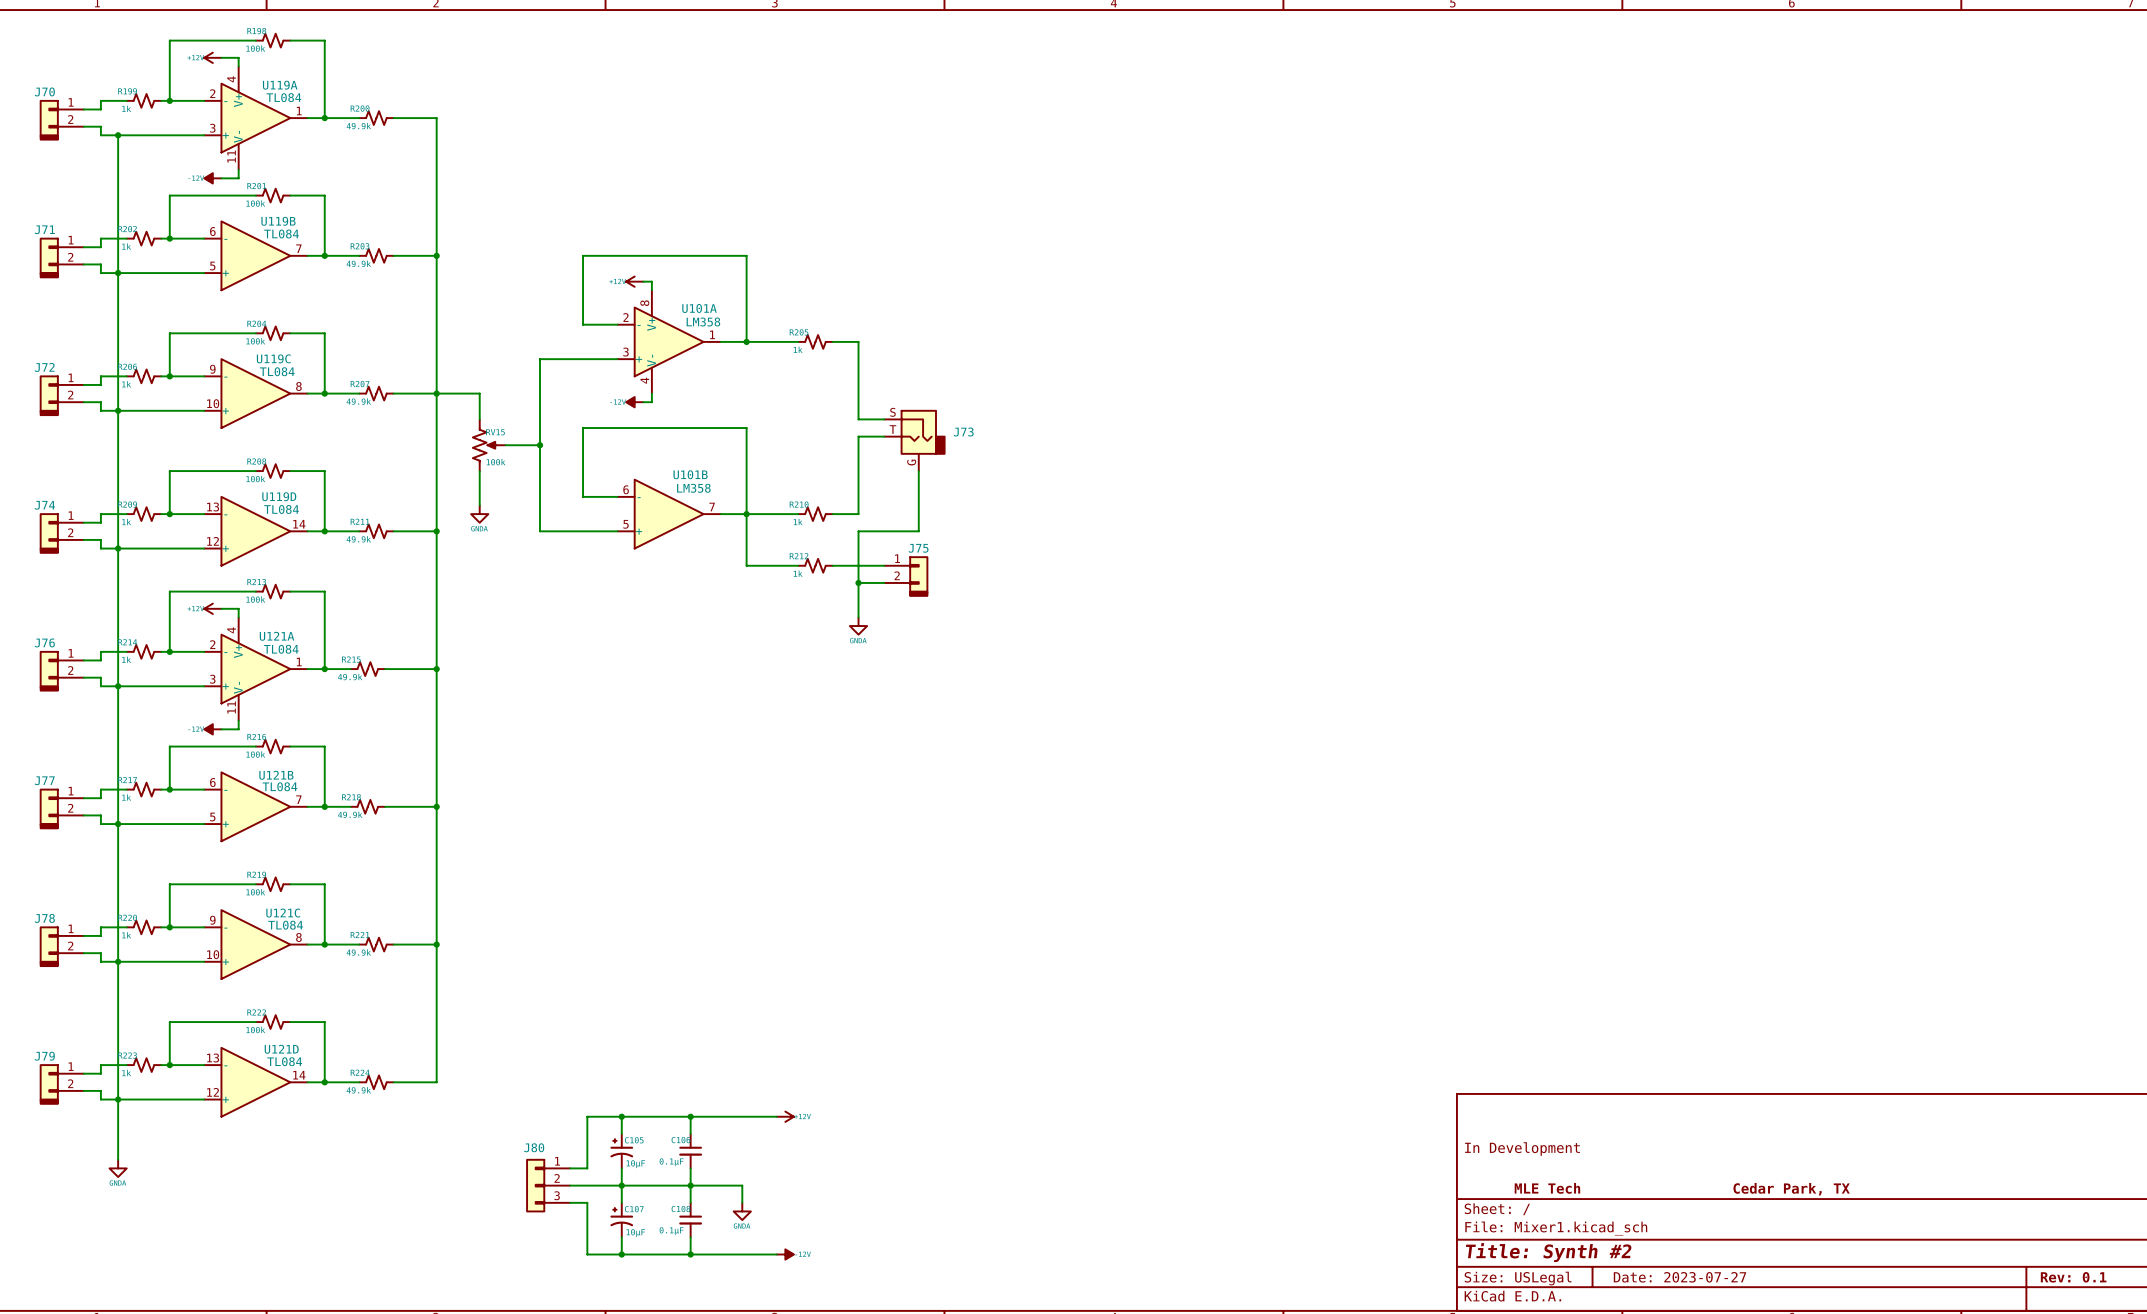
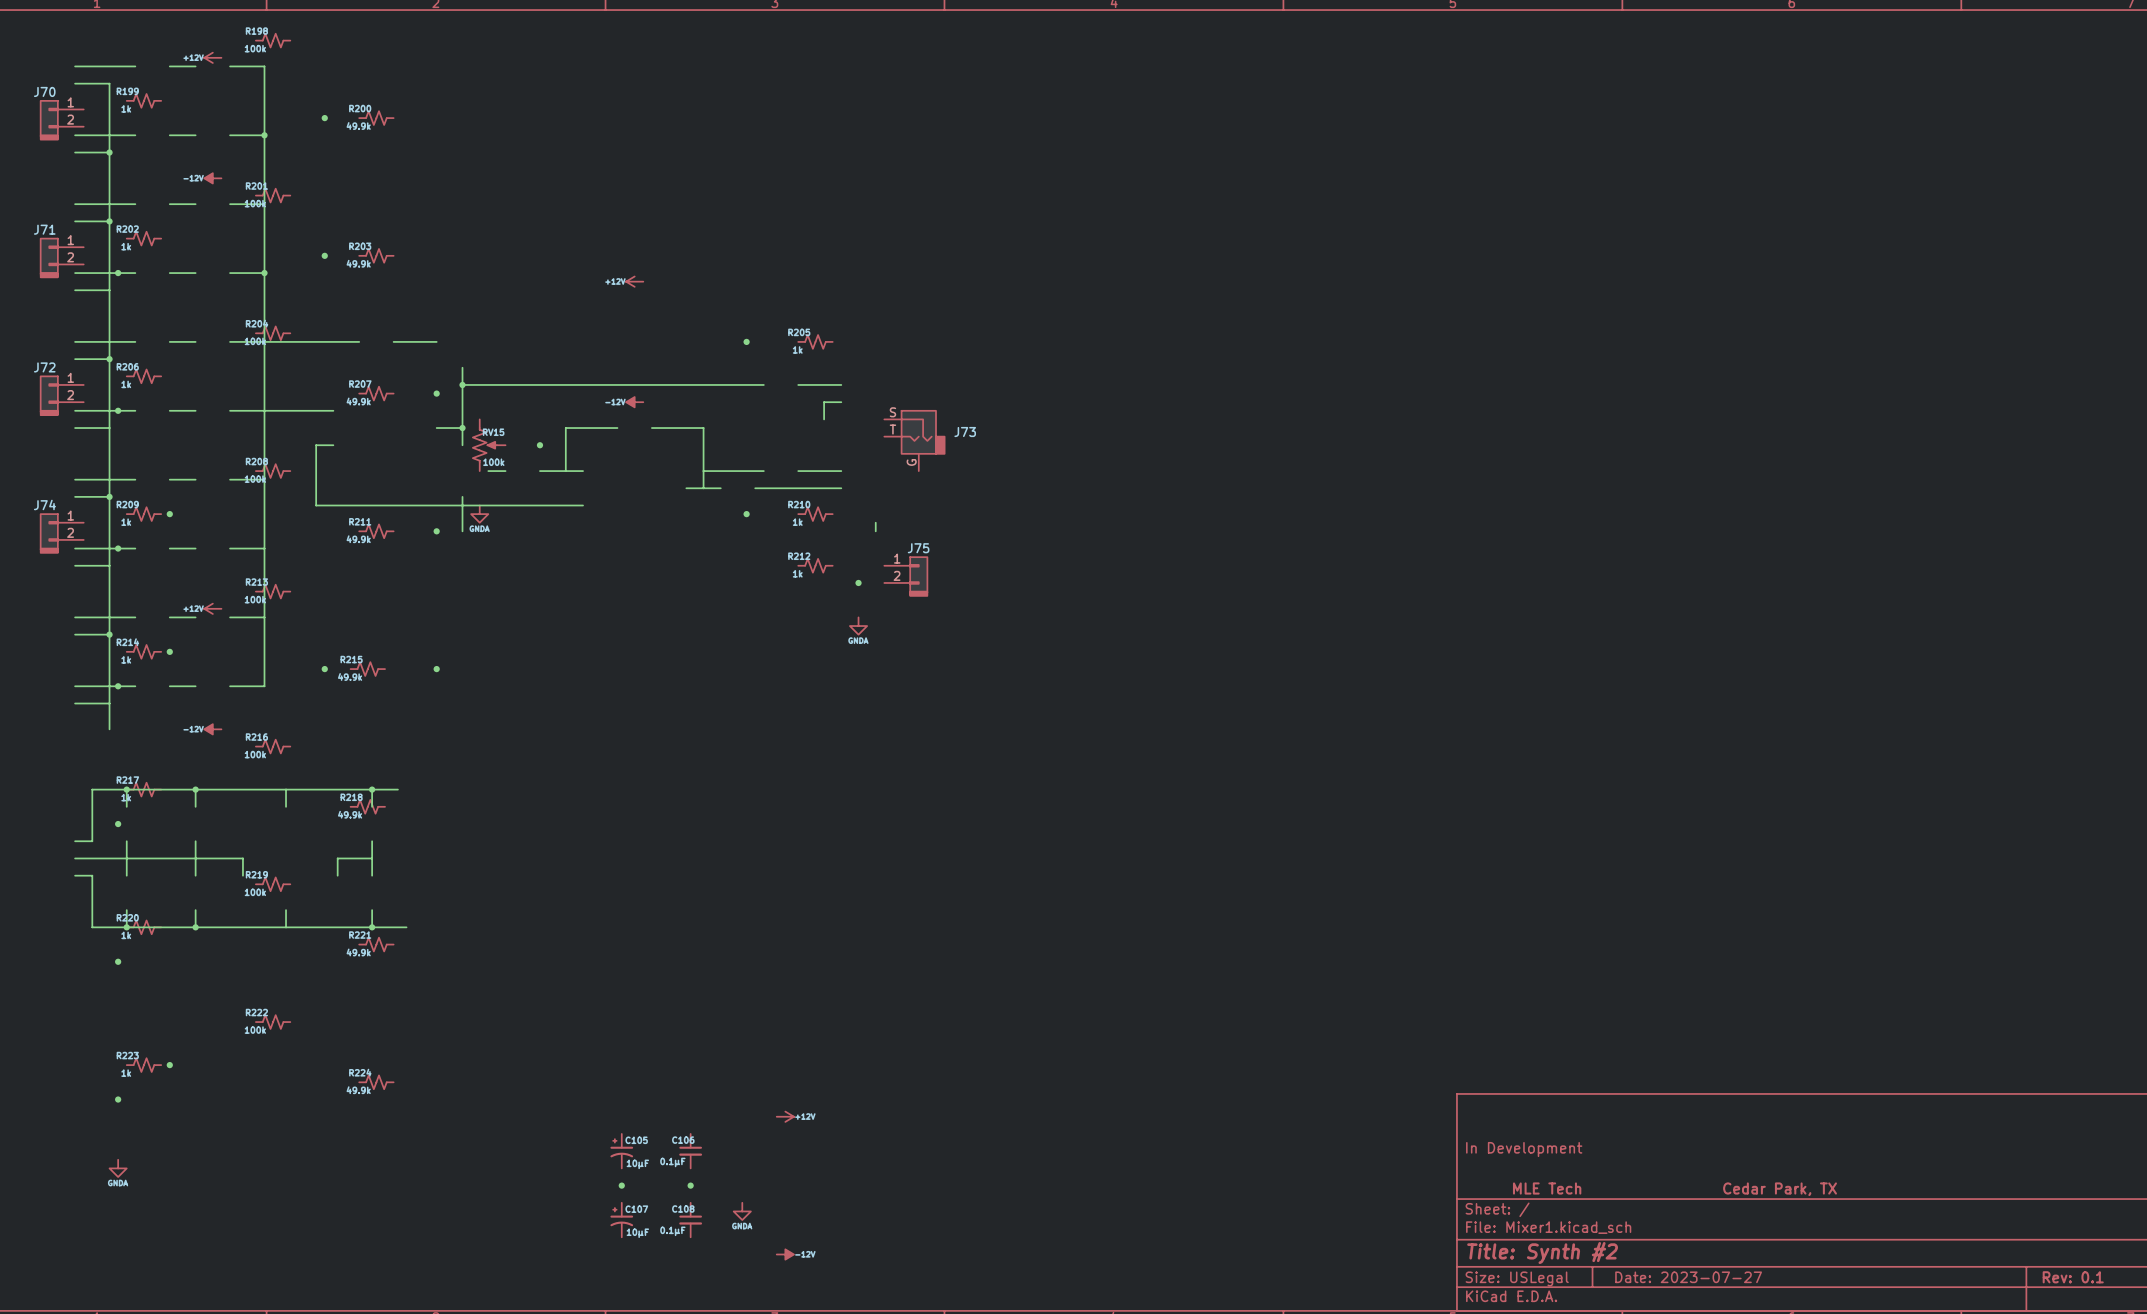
wire: (255, 40) (169, 40) (169, 100) -> none
wire: (290, 40) (324, 40) (324, 118) -> none
wire: (221, 57) (238, 57) (238, 66) -> none
wire: none -> (75, 66) (135, 66)
wire: none -> (169, 66) (195, 66)
wire: none -> (230, 66) (264, 66) (264, 686) (230, 686)
wire: none -> (75, 83) (109, 83) (109, 729)
wire: (126, 100) (100, 100) (100, 109) (83, 109) -> none
wire: (161, 100) (204, 100) -> none
junction: (169, 100) -> none
part: (238, 118) -> none
U119A: TL084 (255, 118) -> none
wire: (307, 118) (359, 118) -> none
wire: (393, 118) (436, 118) (436, 1082) (393, 1082) -> none
wire: (83, 126) (100, 126) (100, 135) -> (75, 135) (100, 135)
wire: (118, 135) (118, 1159) -> none
junction position: (118, 135) -> (109, 152)
wire: (135, 135) (169, 135) -> (75, 152) (109, 152)
wire: (195, 135) (204, 135) -> none
junction: none -> (264, 135)
wire: (238, 169) (238, 178) (221, 178) -> none
wire: (255, 195) (169, 195) (169, 238) -> none
wire: (290, 195) (324, 195) (324, 255) -> none
wire: none -> (75, 204) (135, 204)
wire: none -> (169, 204) (195, 204)
wire: none -> (230, 204) (264, 204)
wire: none -> (75, 221) (109, 221)
junction: none -> (109, 221)
wire: (126, 238) (100, 238) (100, 247) (83, 247) -> none
wire: (161, 238) (204, 238) -> none
junction: (169, 238) -> none
U119B: TL084 (255, 255) -> none
wire: (307, 255) (359, 255) -> none
wire: (393, 255) (436, 255) -> (393, 341) (436, 341)
junction: (436, 255) -> none
wire: (83, 264) (100, 264) (100, 273) -> (75, 273) (100, 273)
wire: (135, 273) (169, 273) -> (75, 290) (109, 290)
wire: (195, 273) (204, 273) -> none
junction: none -> (264, 273)
wire: (643, 281) (651, 281) (651, 290) -> none
wire: (617, 324) (583, 324) (583, 255) (746, 255) (746, 341) -> none
wire: (255, 333) (169, 333) (169, 376) -> none
wire: (290, 333) (324, 333) (324, 393) -> none
wire: none -> (75, 341) (135, 341)
wire: none -> (169, 341) (195, 341)
wire: none -> (230, 341) (359, 341)
part: (651, 341) -> none
U101A: LM358 (669, 341) -> none
wire: (720, 341) (798, 341) -> none
wire: (832, 341) (858, 341) (858, 419) (884, 419) -> none
wire: none -> (75, 359) (109, 359)
junction: none -> (109, 359)
wire: (617, 359) (539, 359) (539, 531) (617, 531) -> none
wire: none -> (462, 367) (462, 445)
wire: (126, 376) (100, 376) (100, 384) (83, 384) -> none
wire: (161, 376) (204, 376) -> none
junction: (169, 376) -> none
wire: none -> (462, 384) (763, 384)
junction: none -> (462, 384)
wire: none -> (798, 384) (841, 384)
U119C: TL084 (255, 393) -> none
wire: (307, 393) (359, 393) -> none
junction: (324, 393) -> none
wire: (393, 393) (479, 393) (479, 419) -> none
wire: (651, 393) (651, 402) (643, 402) -> none
wire: (83, 402) (100, 402) (100, 410) -> (75, 410) (100, 410)
wire: none -> (841, 402) (824, 402) (824, 419)
wire: (135, 410) (169, 410) -> (75, 428) (109, 428)
wire: (195, 410) (204, 410) -> none
wire: none -> (230, 410) (333, 410)
wire: none -> (436, 428) (462, 428)
junction: none -> (462, 428)
wire: (583, 428) (583, 496) (617, 496) -> (583, 428) (565, 428) (565, 471)
wire: (617, 428) (651, 428) -> (686, 488) (720, 488)
wire: (703, 428) (746, 428) (746, 565) (798, 565) -> (703, 428) (703, 488)
wire: (884, 436) (858, 436) (858, 514) (832, 514) -> none
wire: none -> (333, 445) (316, 445) (316, 505) (583, 505)
wire: (505, 445) (539, 445) -> none
wire: (255, 471) (169, 471) (169, 514) -> none
wire: (290, 471) (324, 471) (324, 531) -> none
wire: (479, 471) (479, 505) -> (462, 496) (462, 531)
wire: none -> (488, 471) (505, 471)
wire: none -> (703, 471) (763, 471)
wire: none -> (798, 471) (841, 471)
wire: (918, 471) (918, 531) (858, 531) (858, 617) -> none
wire: none -> (75, 479) (135, 479)
wire: none -> (169, 479) (195, 479)
wire: none -> (230, 479) (264, 479)
wire: none -> (755, 488) (841, 488)
wire: none -> (75, 496) (109, 496)
junction: none -> (109, 496)
wire: (126, 514) (100, 514) (100, 522) (83, 522) -> none
wire: (161, 514) (204, 514) -> none
U101B: LM358 (669, 514) -> none
wire: (720, 514) (798, 514) -> none
wire: none -> (875, 522) (875, 531)
U119D: TL084 (255, 531) -> none
wire: (307, 531) (359, 531) -> none
junction: (324, 531) -> none
wire: (393, 531) (436, 531) -> (539, 471) (583, 471)
wire: (83, 539) (100, 539) (100, 548) -> (75, 548) (100, 548)
wire: (135, 548) (169, 548) -> (75, 565) (109, 565)
wire: (195, 548) (204, 548) -> none
wire: (832, 565) (884, 565) -> none
wire: (858, 582) (884, 582) -> none
wire: (255, 591) (169, 591) (169, 651) -> none
wire: (290, 591) (324, 591) (324, 669) -> none
wire: (221, 608) (238, 608) (238, 617) -> none
wire: none -> (75, 617) (135, 617)
wire: none -> (169, 617) (195, 617)
wire: none -> (230, 617) (264, 617)
wire: none -> (75, 634) (109, 634)
junction: none -> (109, 634)
wire: (126, 651) (100, 651) (100, 660) (83, 660) -> none
wire: (161, 651) (204, 651) -> none
part: (238, 669) -> none
U121A: TL084 (255, 669) -> none
wire: (307, 669) (350, 669) -> none
wire: (385, 669) (436, 669) -> none
J76: (61, 670) -> none
wire: (83, 677) (100, 677) (100, 686) -> (75, 686) (100, 686)
wire: (135, 686) (169, 686) -> (75, 703) (109, 703)
wire: (195, 686) (204, 686) -> none
wire: (238, 720) (238, 729) (221, 729) -> none
wire: (255, 746) (169, 746) (169, 789) -> none
wire: (290, 746) (324, 746) (324, 806) -> none
wire: (100, 789) (100, 798) (83, 798) -> (100, 789) (92, 789) (92, 841) (75, 841)
junction: none -> (126, 789)
wire: none -> (161, 789) (126, 789) (126, 806)
junction: (169, 789) -> none
wire: none -> (195, 789) (195, 806)
junction: none -> (195, 789)
wire: none -> (204, 789) (397, 789)
wire: none -> (286, 789) (286, 806)
wire: none -> (372, 789) (372, 806)
junction: none -> (372, 789)
U121B: TL084 (255, 806) -> none
wire: (307, 806) (350, 806) -> none
junction: (324, 806) -> none
wire: (385, 806) (436, 806) -> none
junction: (436, 806) -> none
J77: (61, 808) -> none
wire: (83, 815) (100, 815) (100, 824) (204, 824) -> none
wire: none -> (126, 841) (126, 875)
wire: none -> (195, 841) (195, 875)
wire: none -> (372, 841) (372, 875)
wire: none -> (75, 858) (242, 858) (242, 875)
wire: none -> (372, 858) (337, 858) (337, 875)
wire: (255, 884) (169, 884) (169, 927) -> none
wire: (290, 884) (324, 884) (324, 944) -> none
wire: none -> (126, 910) (126, 927) (161, 927)
wire: none -> (195, 910) (195, 927)
wire: none -> (286, 910) (286, 927)
wire: none -> (372, 910) (372, 927)
wire: (100, 927) (100, 935) (83, 935) -> (100, 927) (92, 927) (92, 875) (75, 875)
junction: none -> (126, 927)
junction: (169, 927) -> none
junction: none -> (195, 927)
wire: none -> (204, 927) (406, 927)
junction: none -> (372, 927)
U121C: TL084 (255, 944) -> none
wire: (307, 944) (359, 944) -> none
junction: (324, 944) -> none
wire: (393, 944) (436, 944) -> none
junction: (436, 944) -> none
J78: (61, 946) -> none
wire: (83, 953) (100, 953) (100, 961) (204, 961) -> none
wire: (255, 1022) (169, 1022) (169, 1065) -> none
wire: (290, 1022) (324, 1022) (324, 1082) -> none
wire: (126, 1065) (100, 1065) (100, 1073) (83, 1073) -> none
wire: (161, 1065) (204, 1065) -> none
U121D: TL084 (255, 1082) -> none
wire: (307, 1082) (359, 1082) -> none
junction: (324, 1082) -> none
J79: (61, 1084) -> none
wire: (83, 1090) (100, 1090) (100, 1099) (204, 1099) -> none
wire: (621, 1116) (621, 1133) -> none
junction: (621, 1116) -> none
wire: (690, 1116) (690, 1133) -> none
junction: (690, 1116) -> none
wire: (776, 1116) (587, 1116) (587, 1168) (570, 1168) -> none
wire: (621, 1168) (621, 1202) -> none
wire: (690, 1168) (690, 1202) -> none
J80: (548, 1185) -> none
wire: (570, 1185) (742, 1185) (742, 1202) -> none
wire: (570, 1202) (587, 1202) (587, 1254) (776, 1254) -> none
wire: (621, 1237) (621, 1254) -> none
wire: (690, 1237) (690, 1254) -> none
junction: (621, 1254) -> none
junction: (690, 1254) -> none

